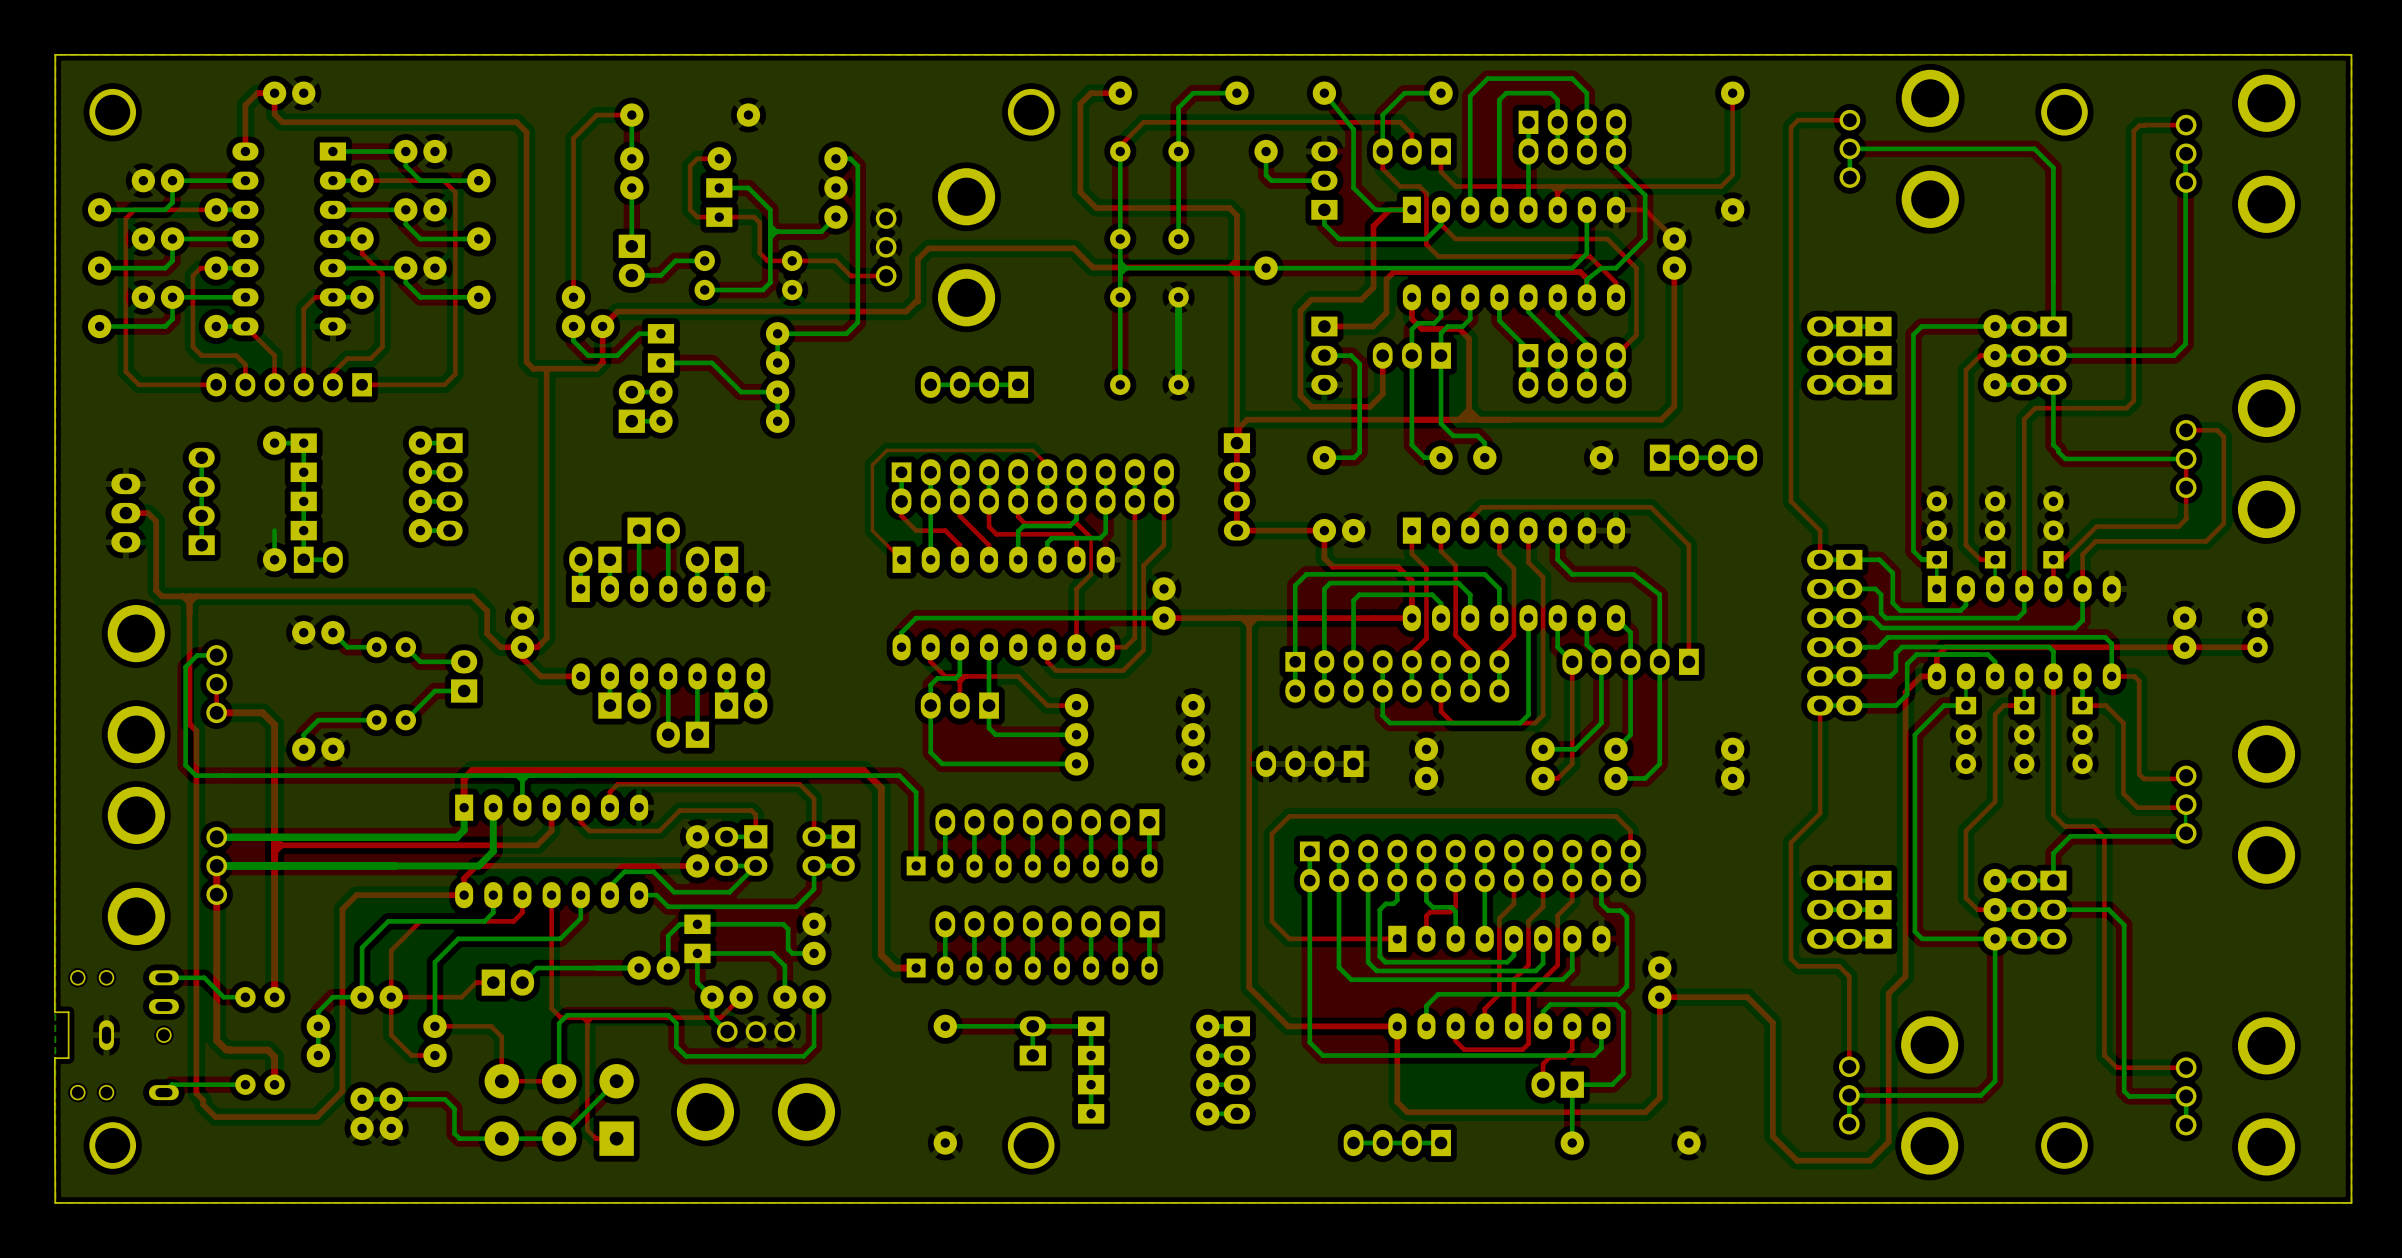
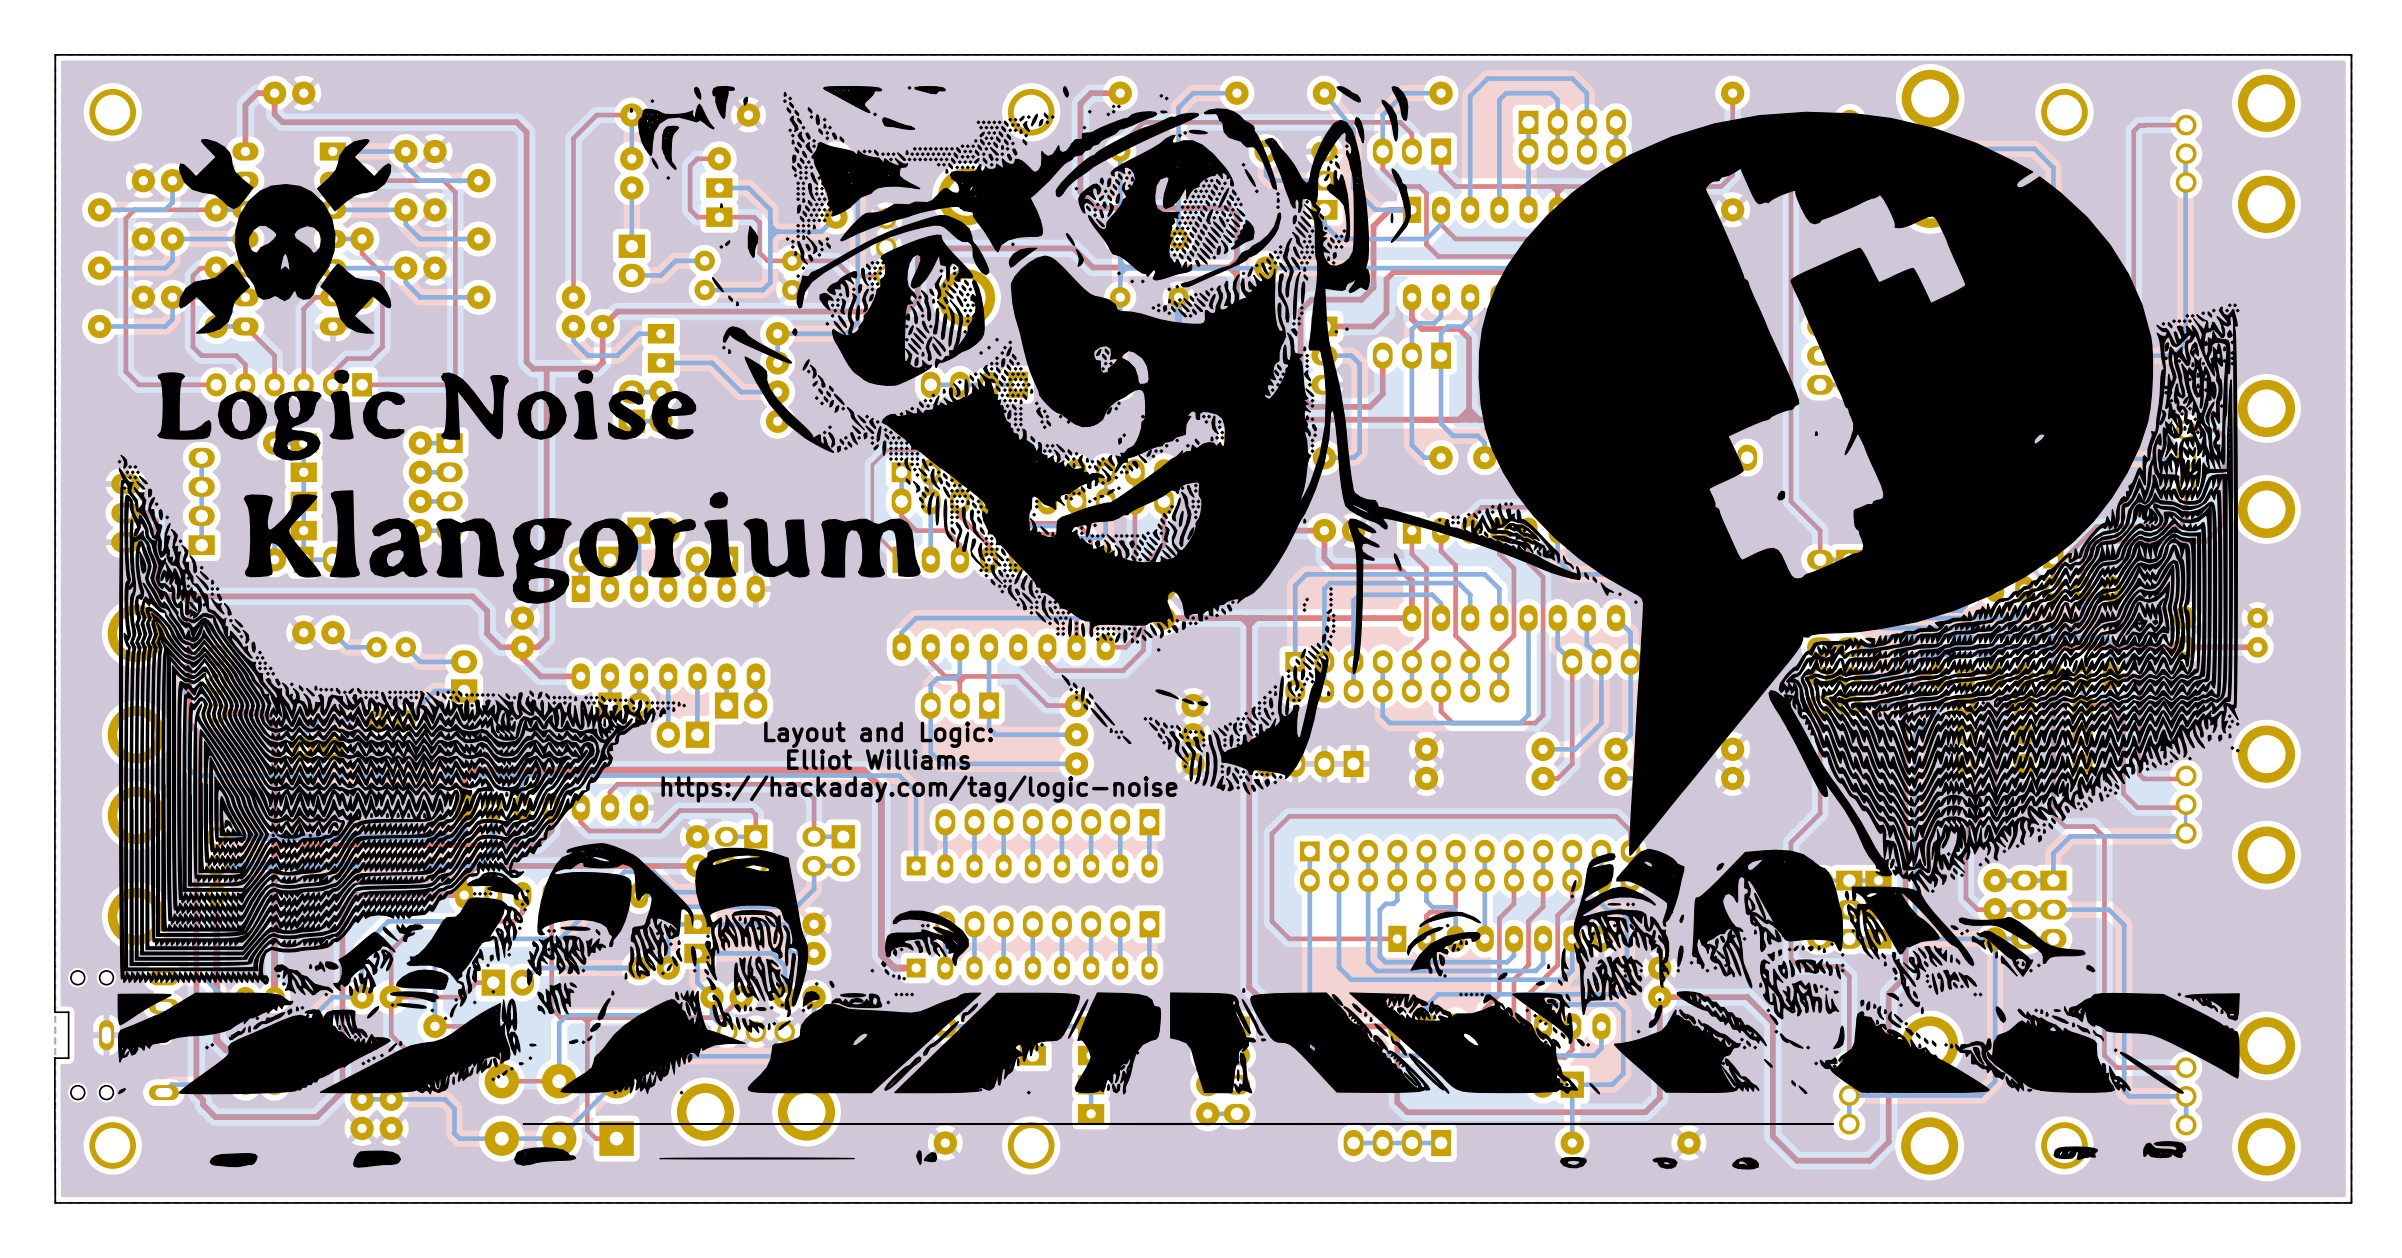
drawing: none -> [117, 85, 2240, 1170]
text: none -> Layout and Logic: (878, 734)
text: none -> Elliot Williams (878, 759)
text: none -> https://hackaday.com/tag/logic-noise (919, 789)

